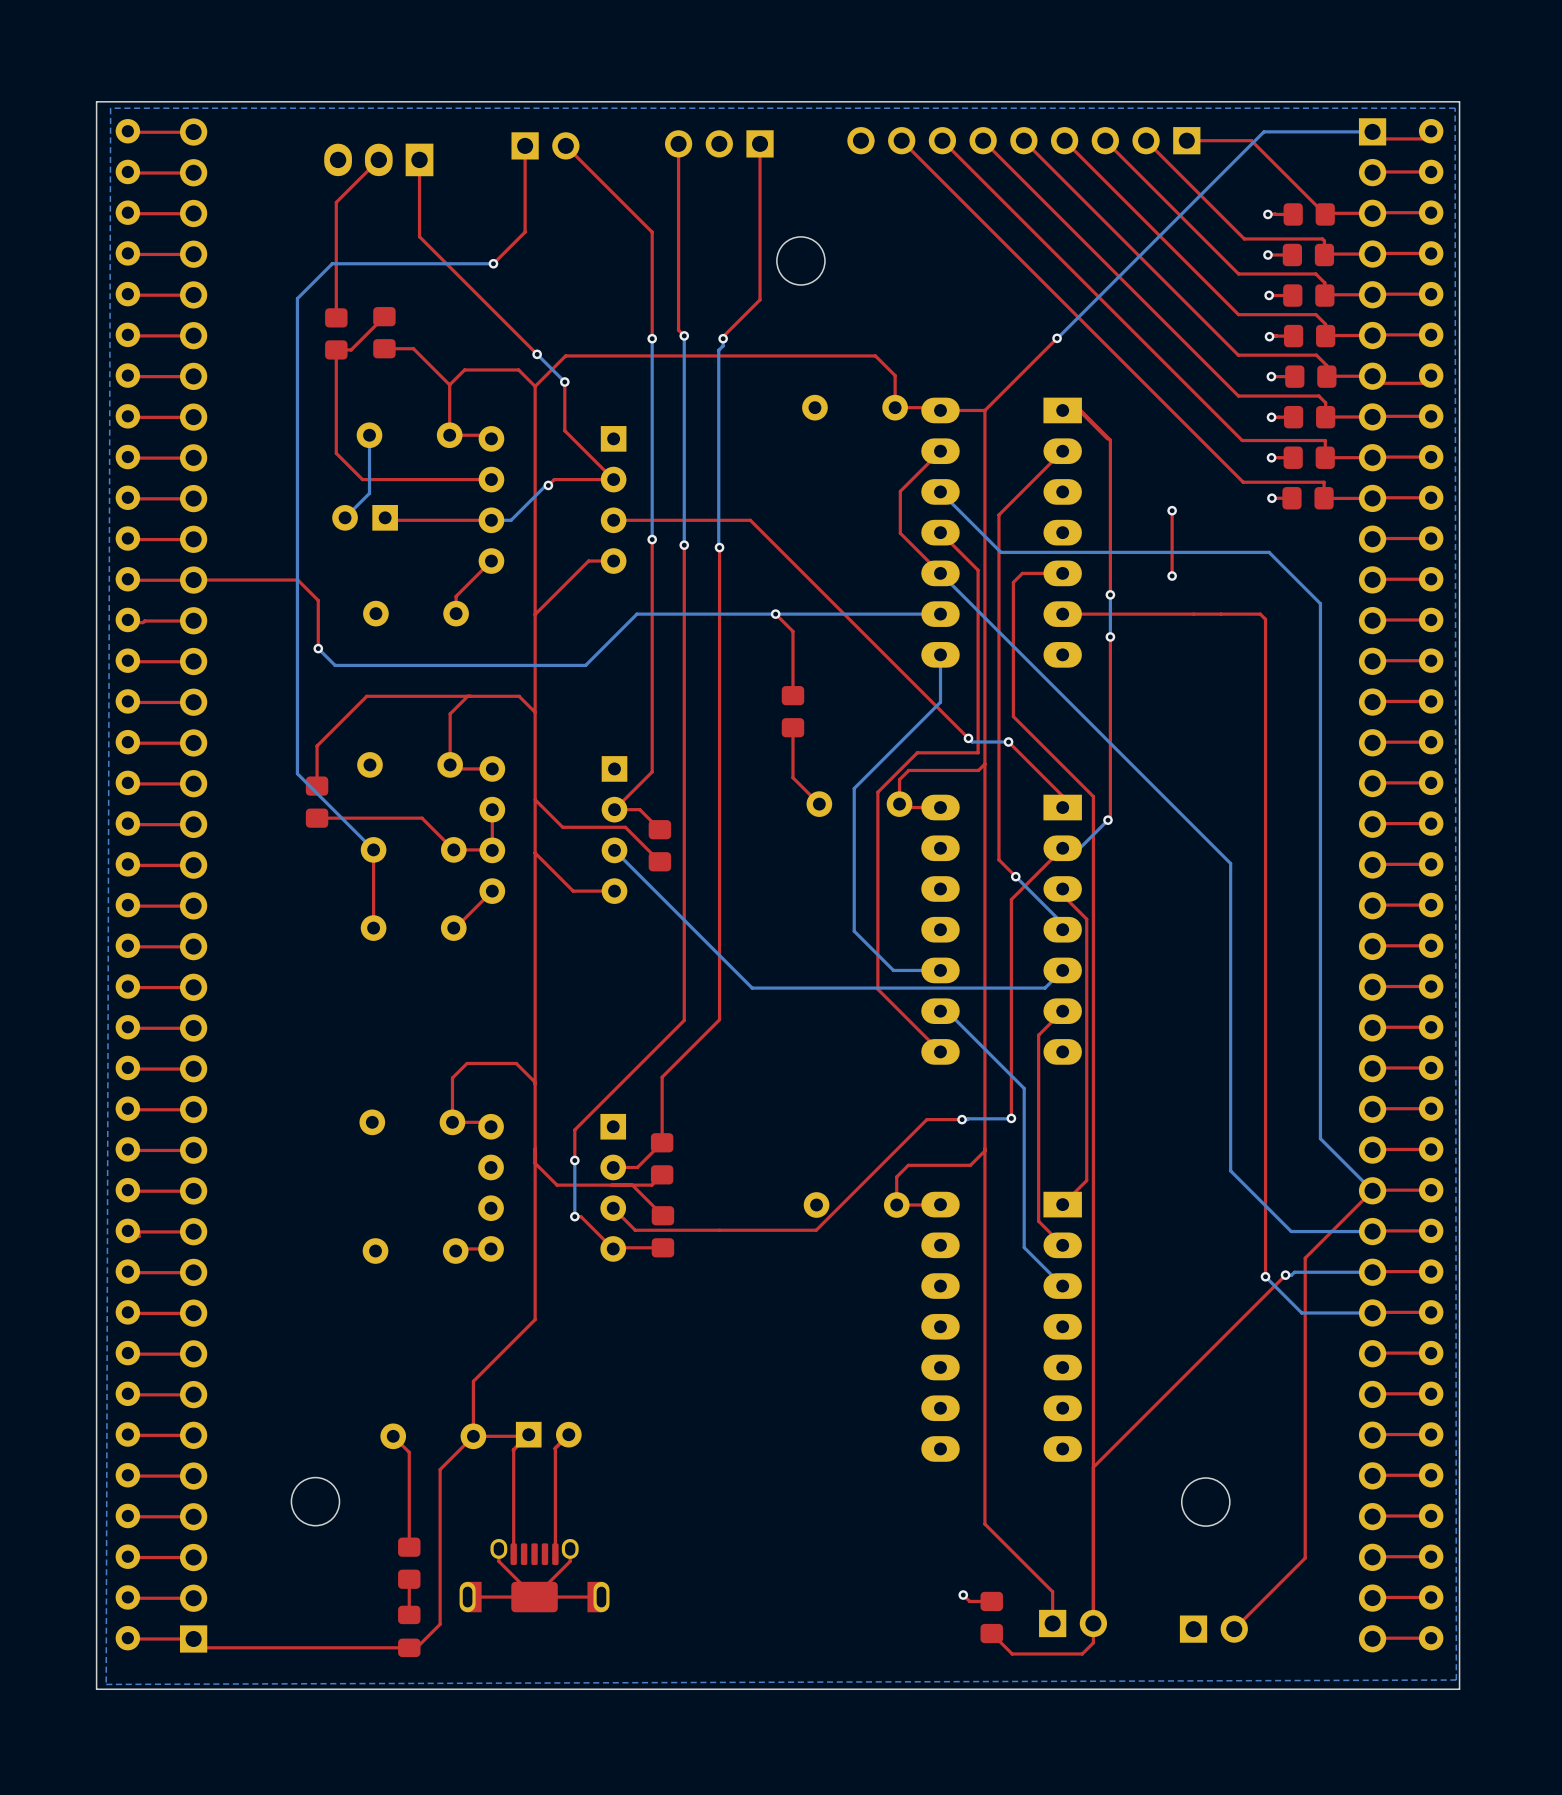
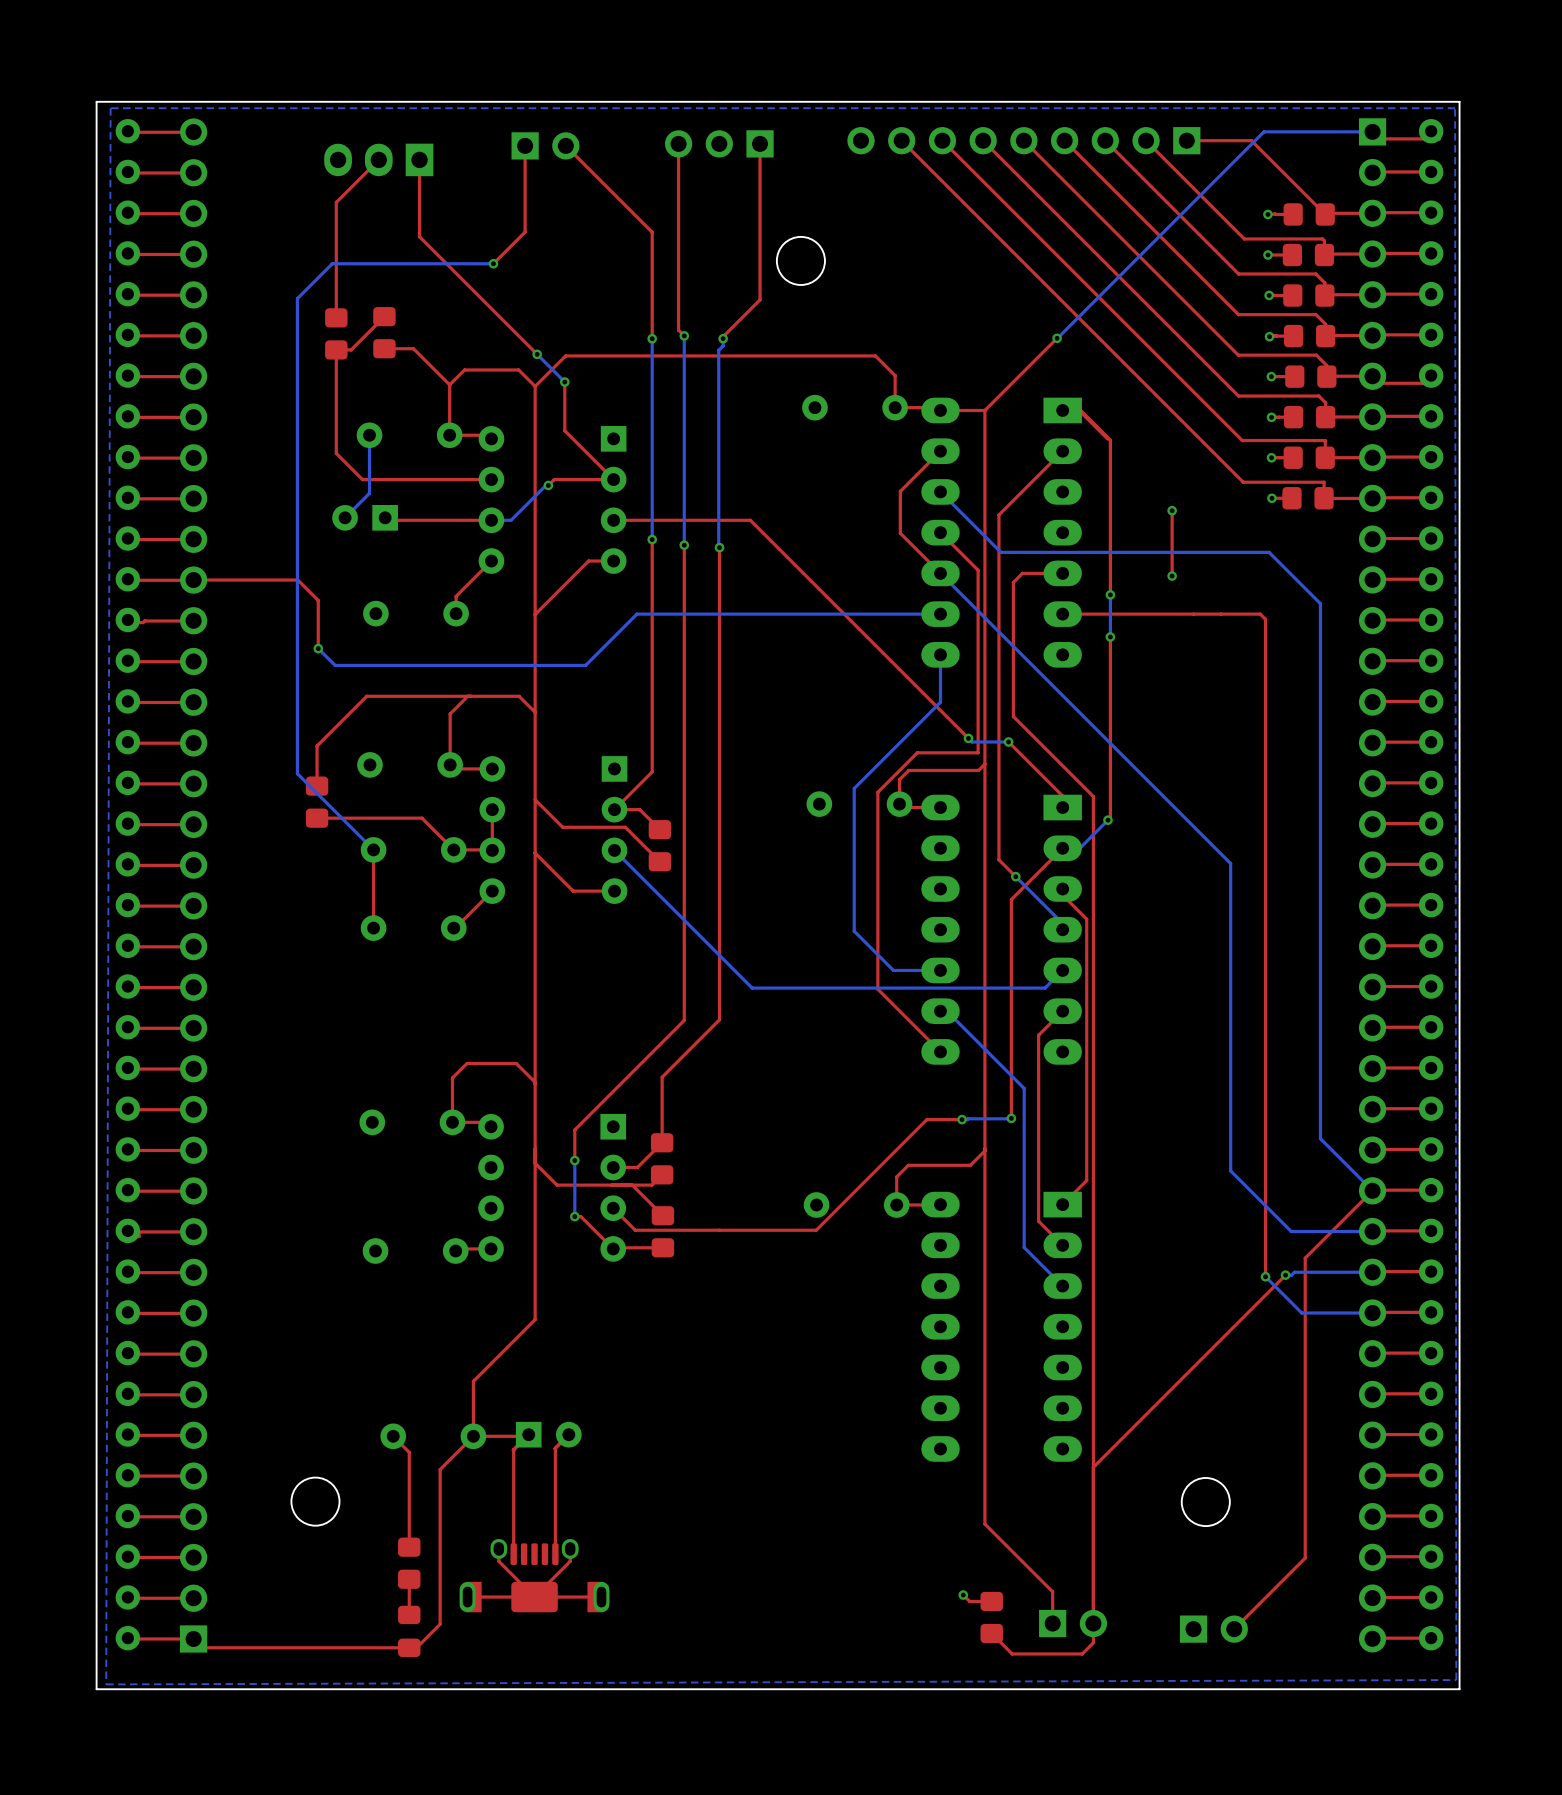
top track: (775, 614) (792, 631) (792, 695) -> none
via: (775, 614) -> none
part: (792, 711) -> none
top track: (792, 727) (792, 777) (819, 804) -> none

